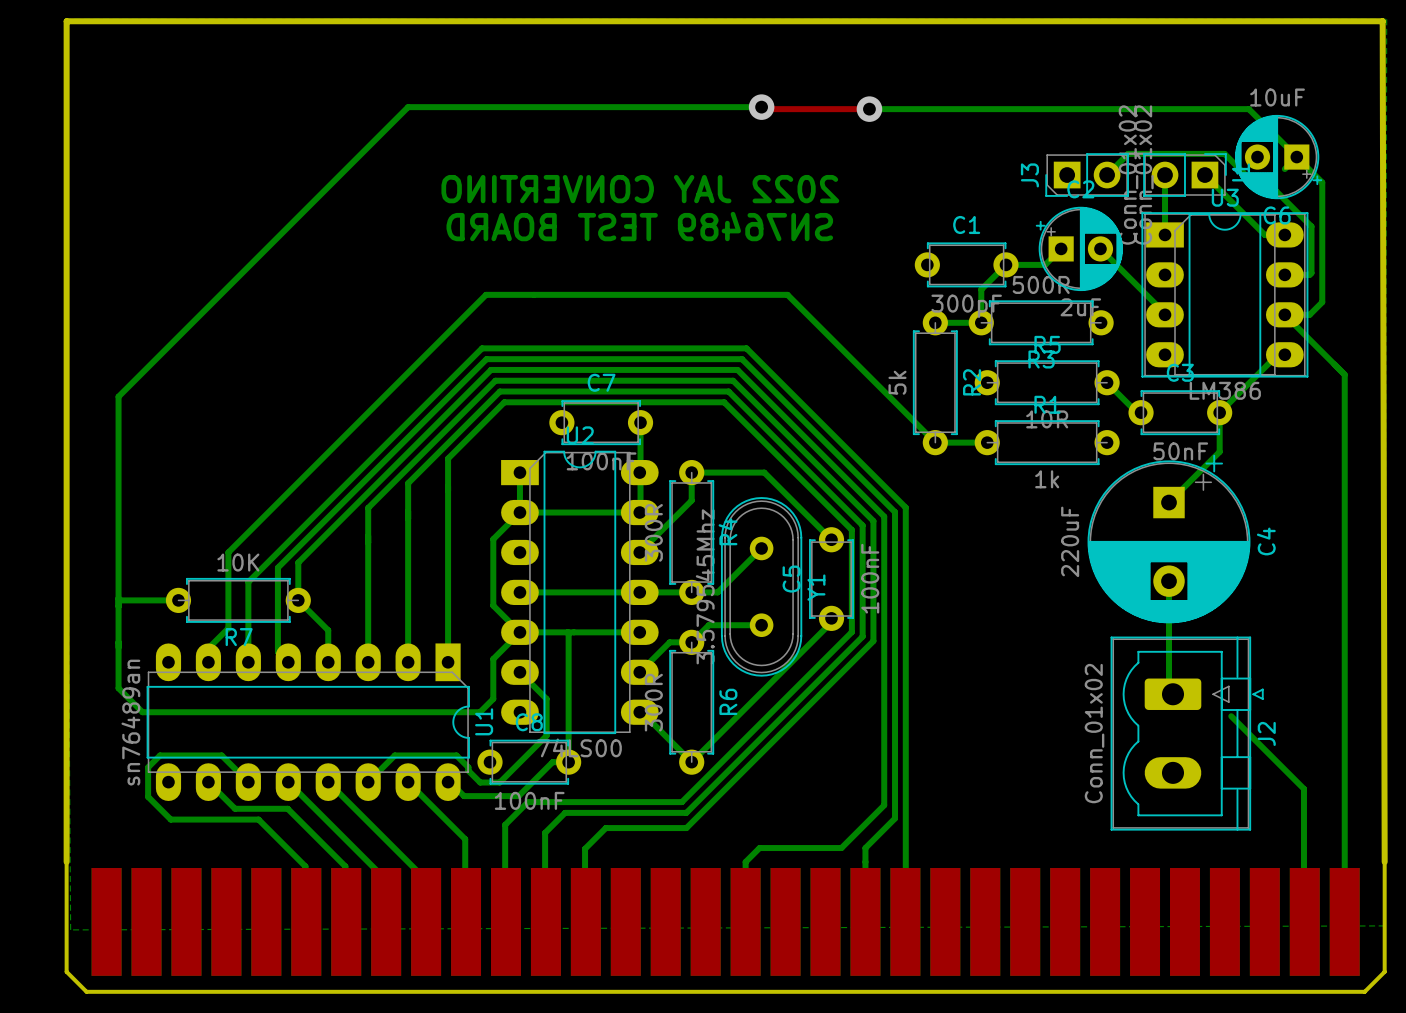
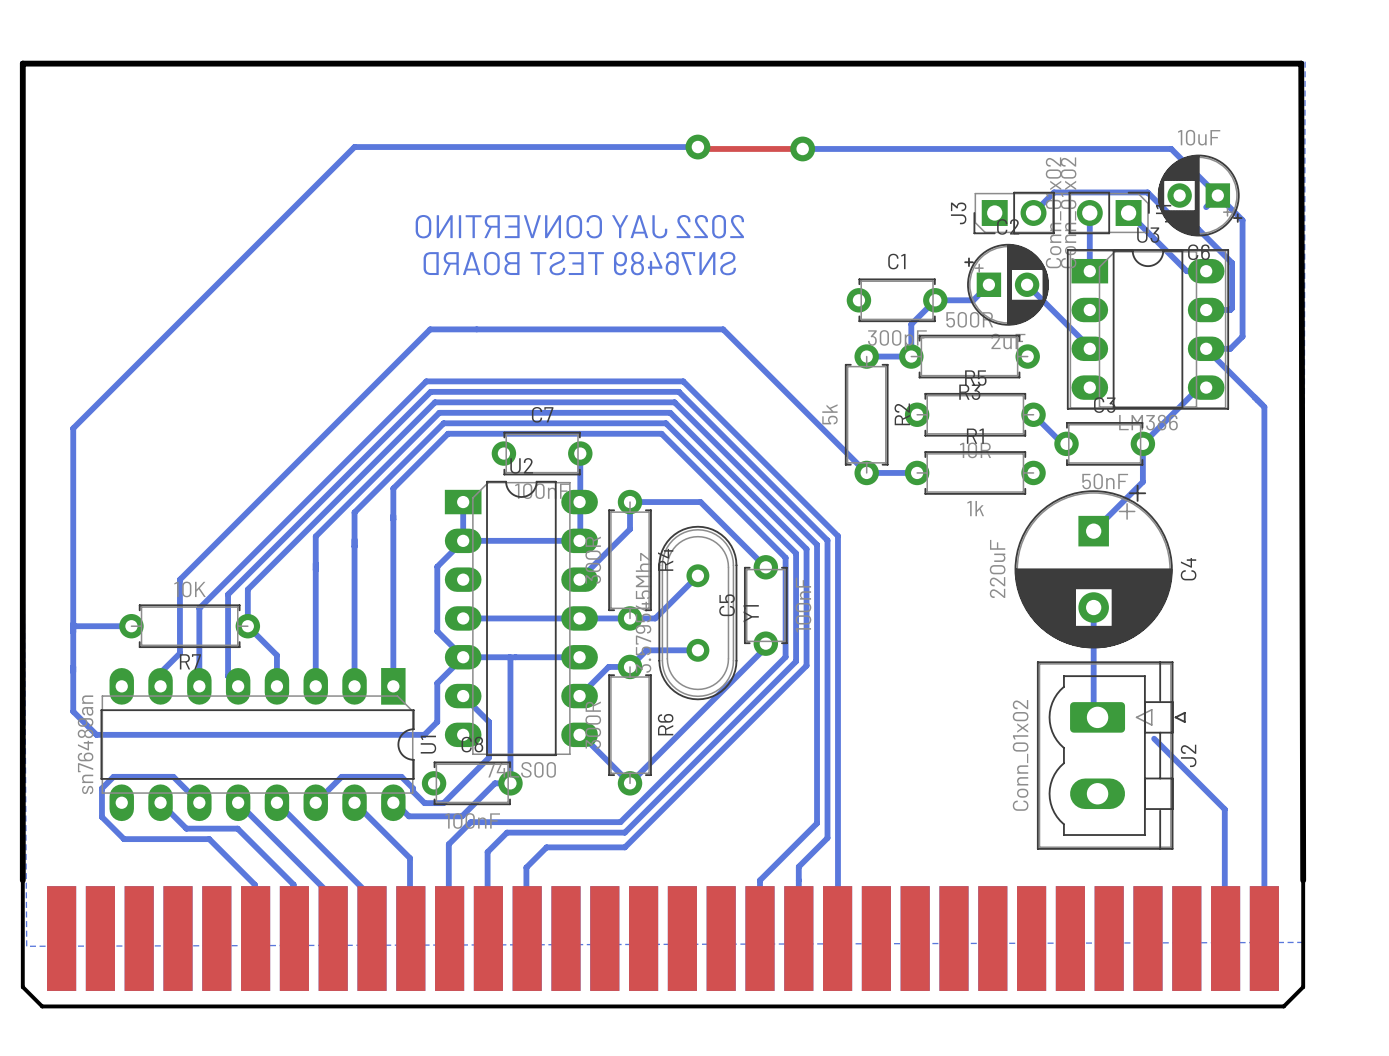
bottom track: (884, 803) (841, 848) (759, 848) (745, 862) (745, 921) -> (817, 823) (759, 880) (759, 938)

